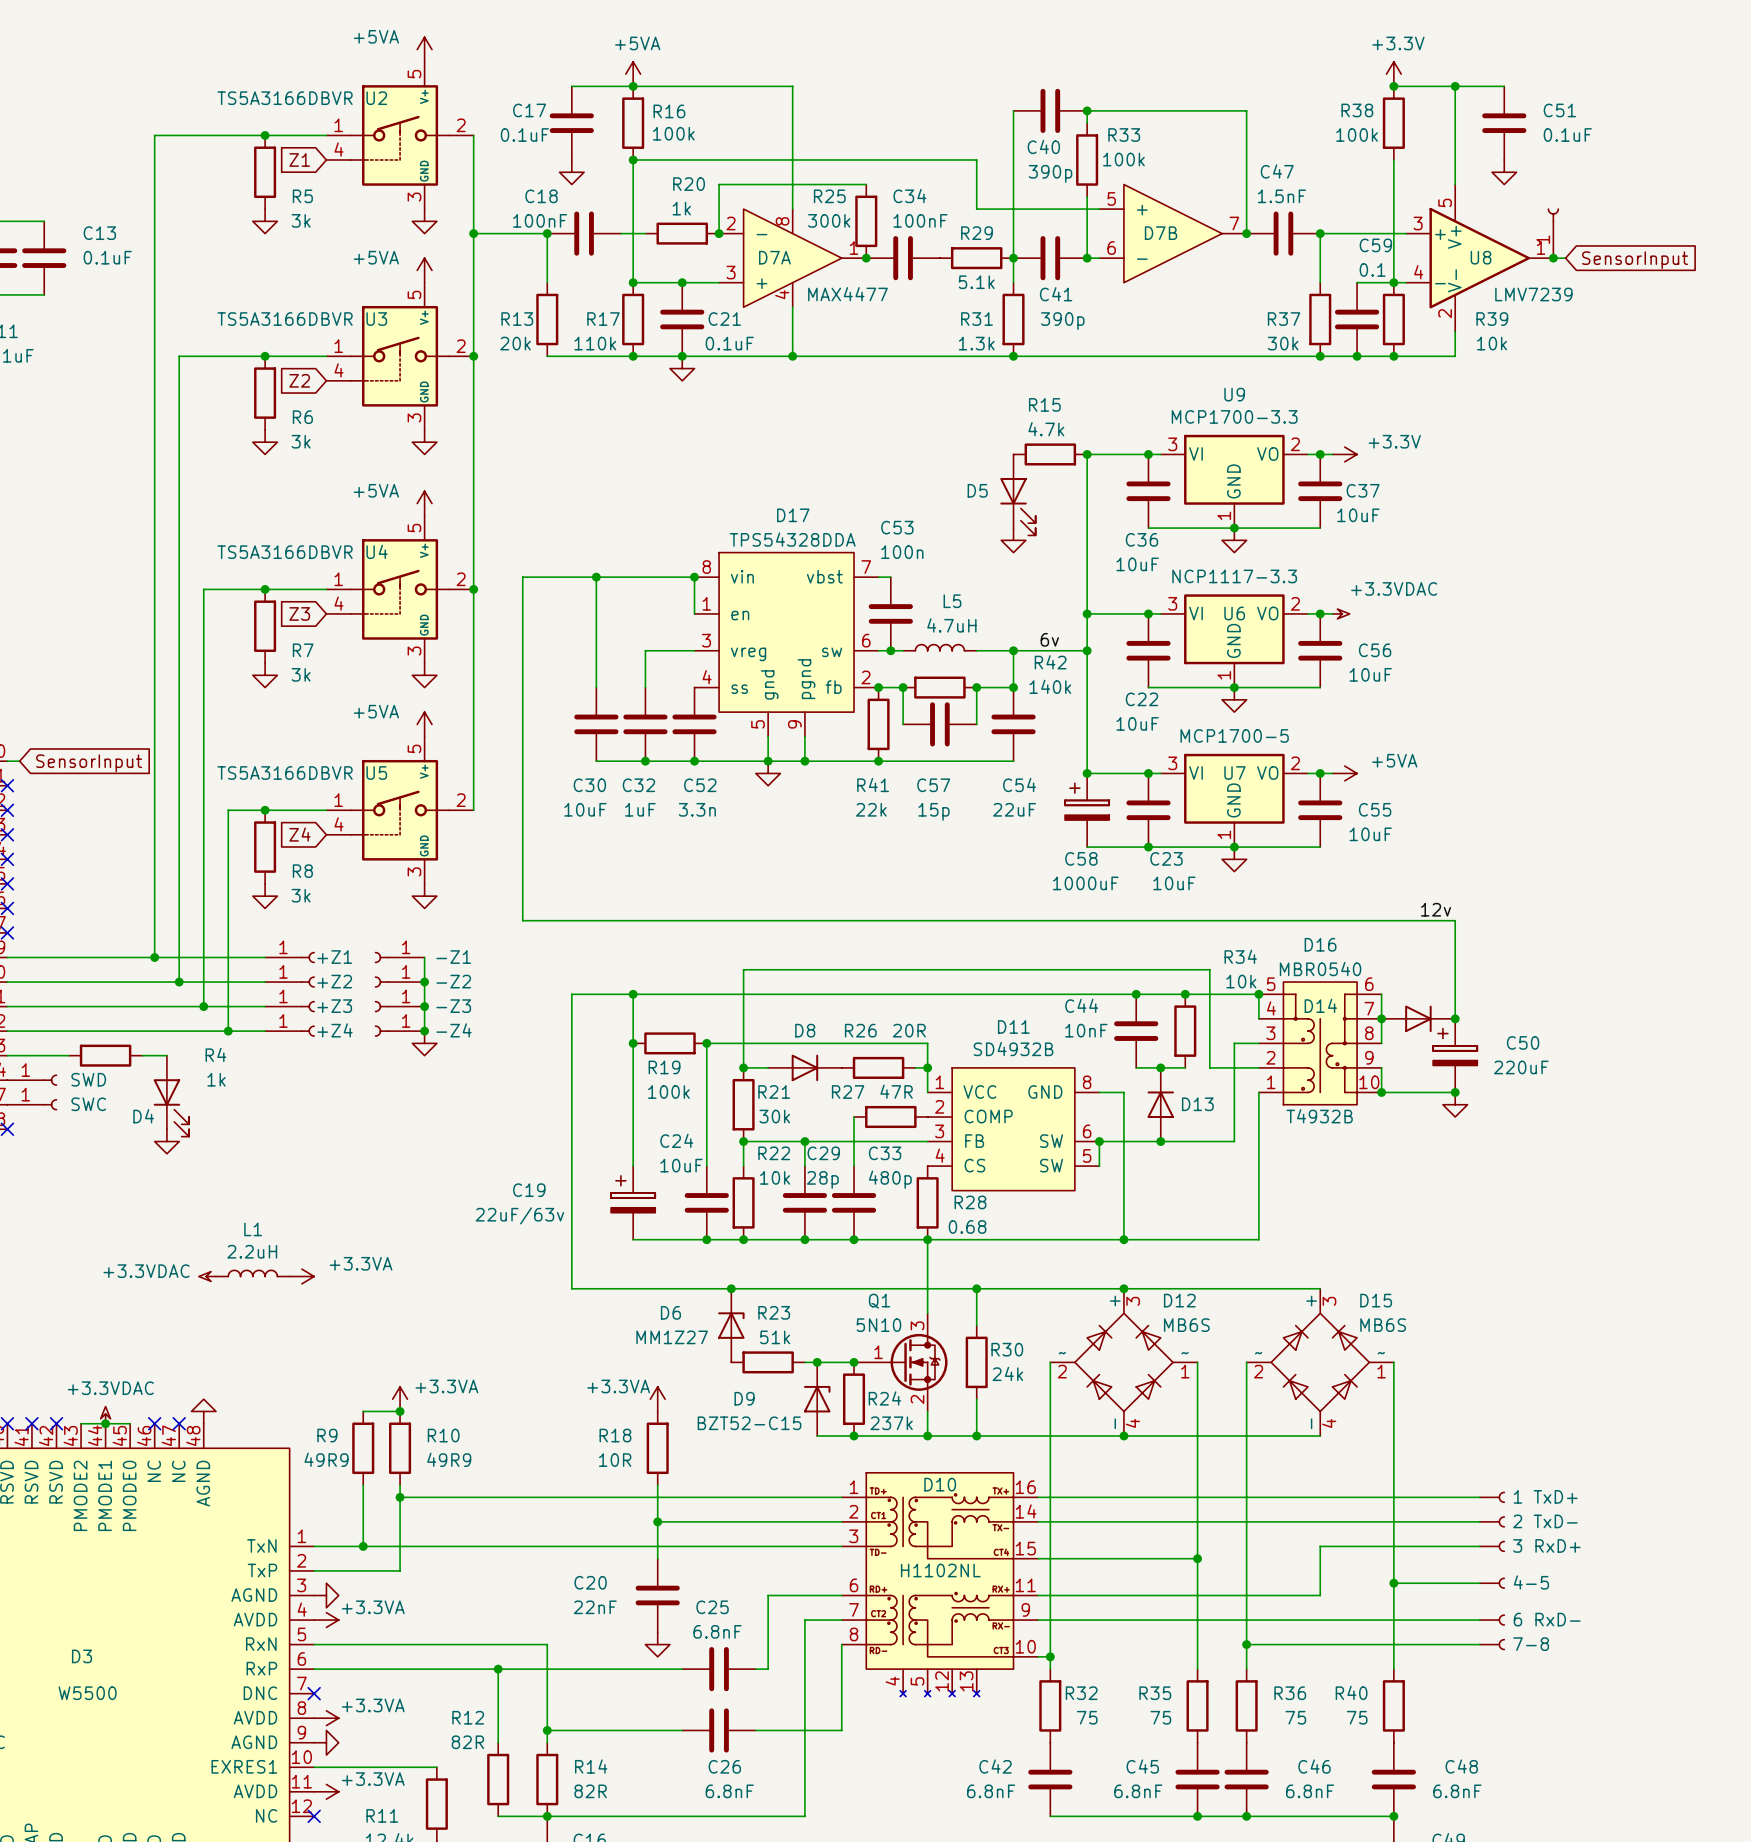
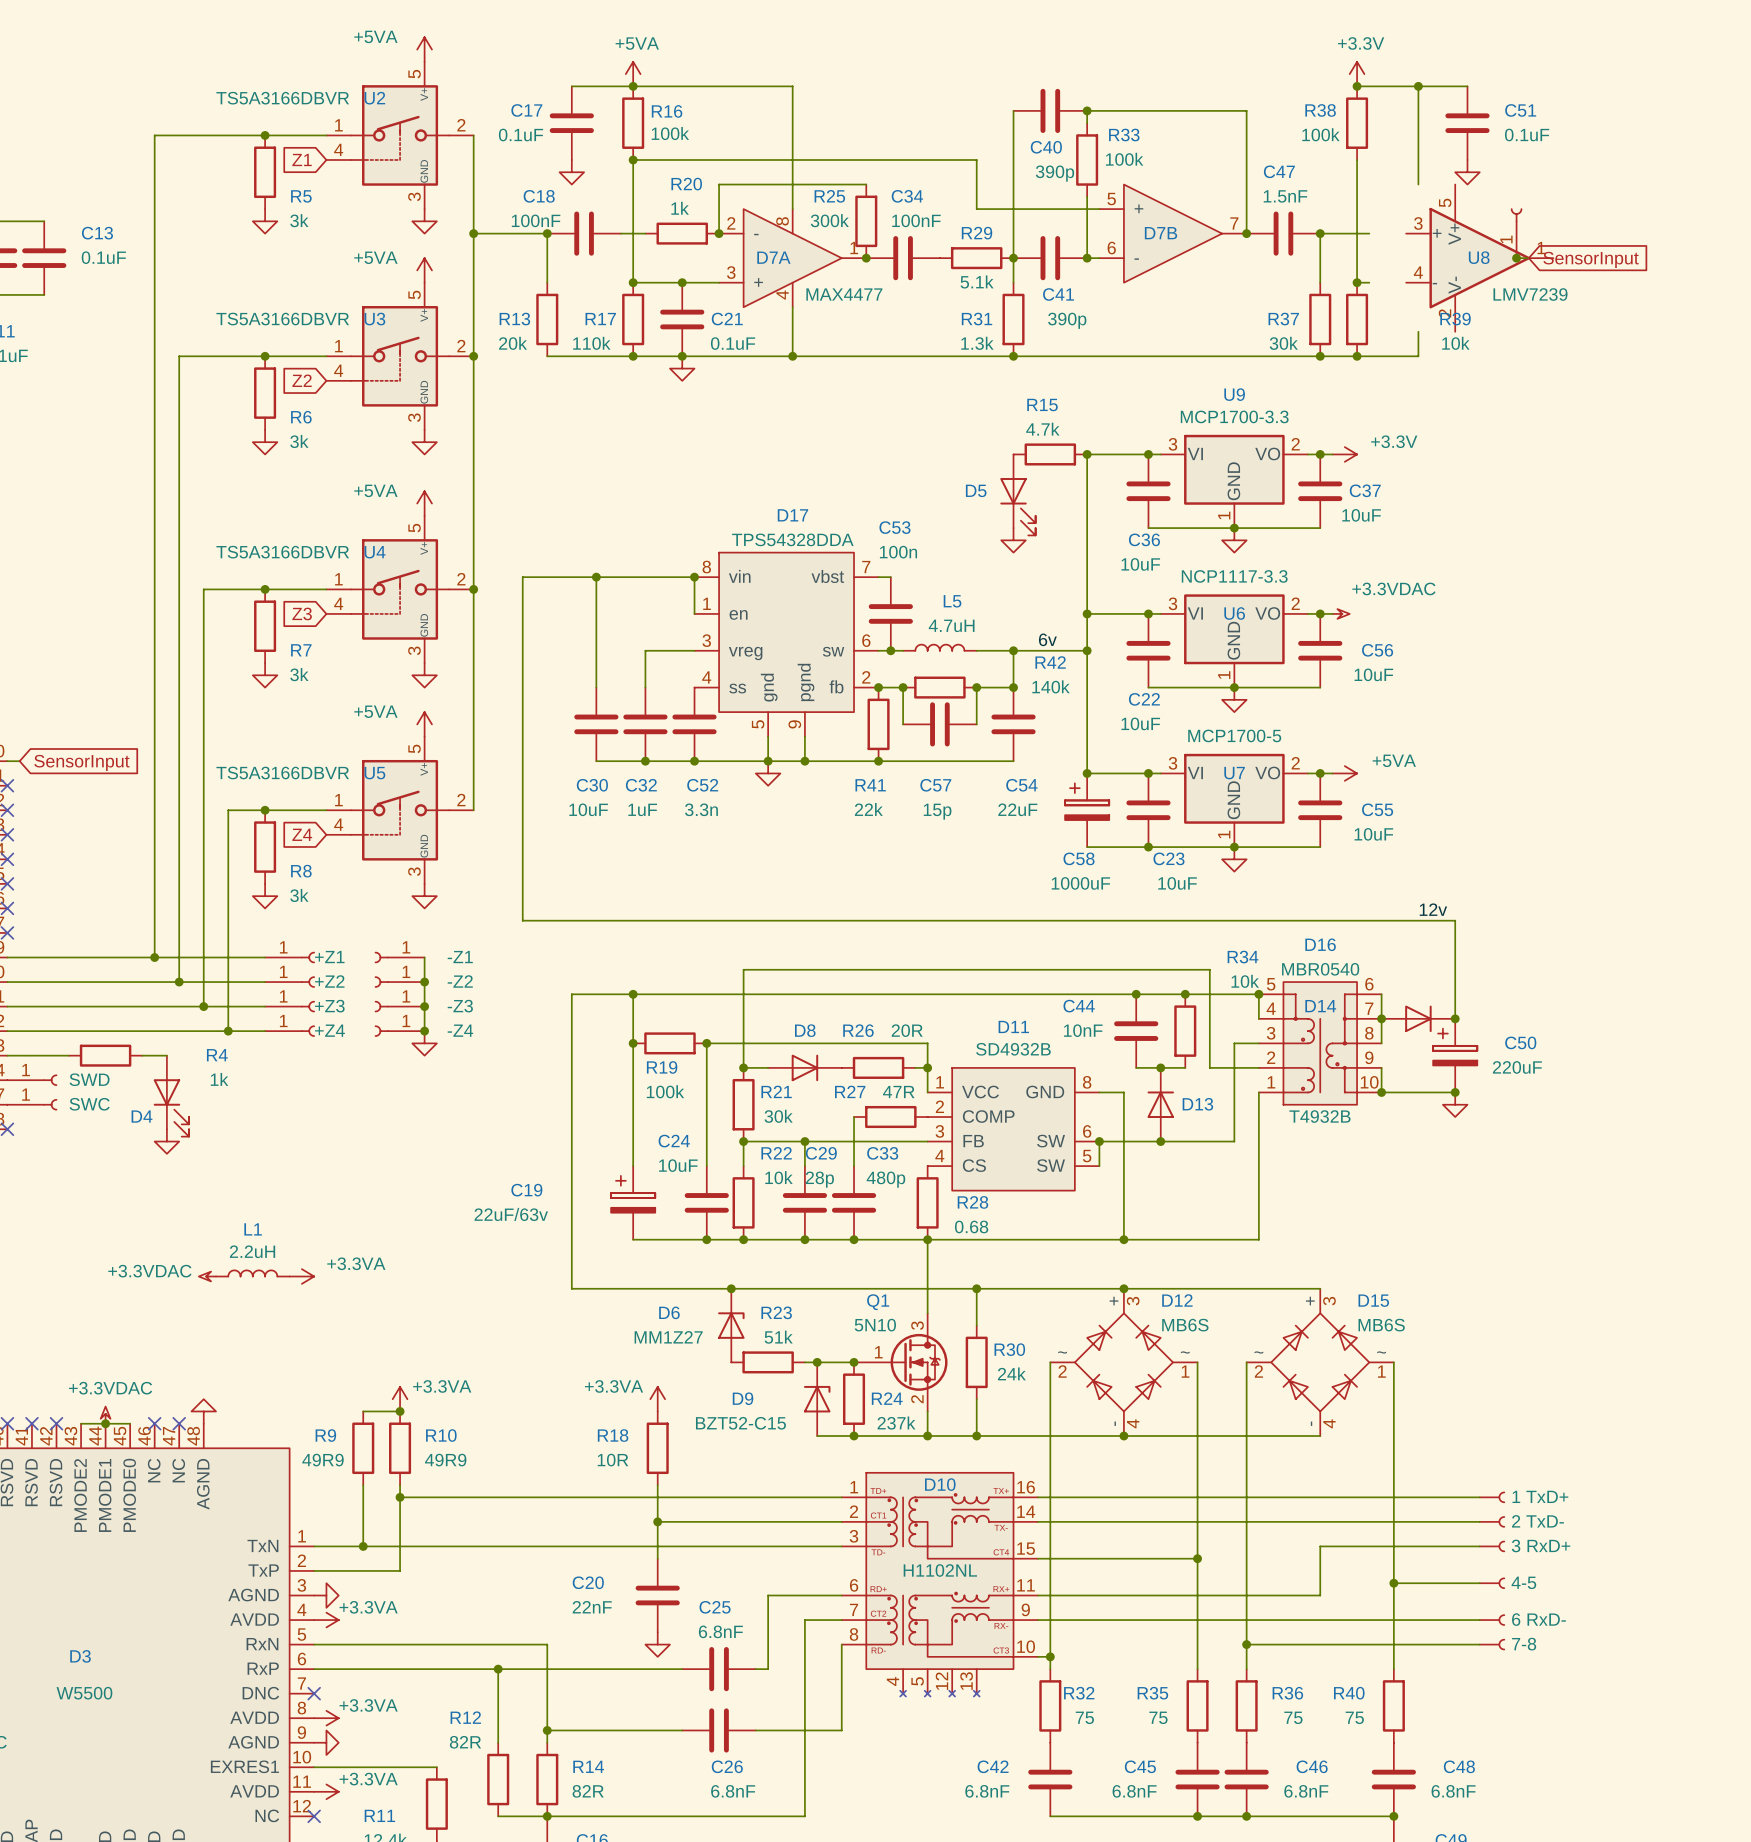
power symbol position: +3.3V (1393, 74) -> +3.3V (1357, 74)
junction: none -> (1357, 86)
junction: (1393, 86) -> none
junction: none -> (1418, 86)
wire: (1455, 86) (1455, 184) -> (1418, 86) (1418, 184)
junction: (1455, 86) -> none
wire: (1467, 86) (1504, 86) -> (1357, 86) (1393, 86)
R38 position: (1393, 123) -> (1357, 123)
C51 position: (1504, 123) -> (1467, 123)
wire: (1393, 159) (1393, 282) -> (1357, 159) (1357, 282)
power symbol position: (1504, 172) -> (1467, 172)
wire: (1369, 233) (1406, 233) -> none
part position: (1553, 233) -> (1516, 233)
junction position: (1553, 258) -> (1516, 258)
global label position: SensorInput (1635, 260) -> SensorInput (1591, 259)
wire: (1369, 282) (1406, 282) -> none
junction position: (1393, 282) -> (1357, 282)
C59: 0.1 (1357, 319) -> none
R39 position: (1393, 319) -> (1357, 319)
wire: (1455, 331) (1455, 356) (1418, 356) -> (1418, 331) (1418, 356)
junction: (1393, 356) -> none

